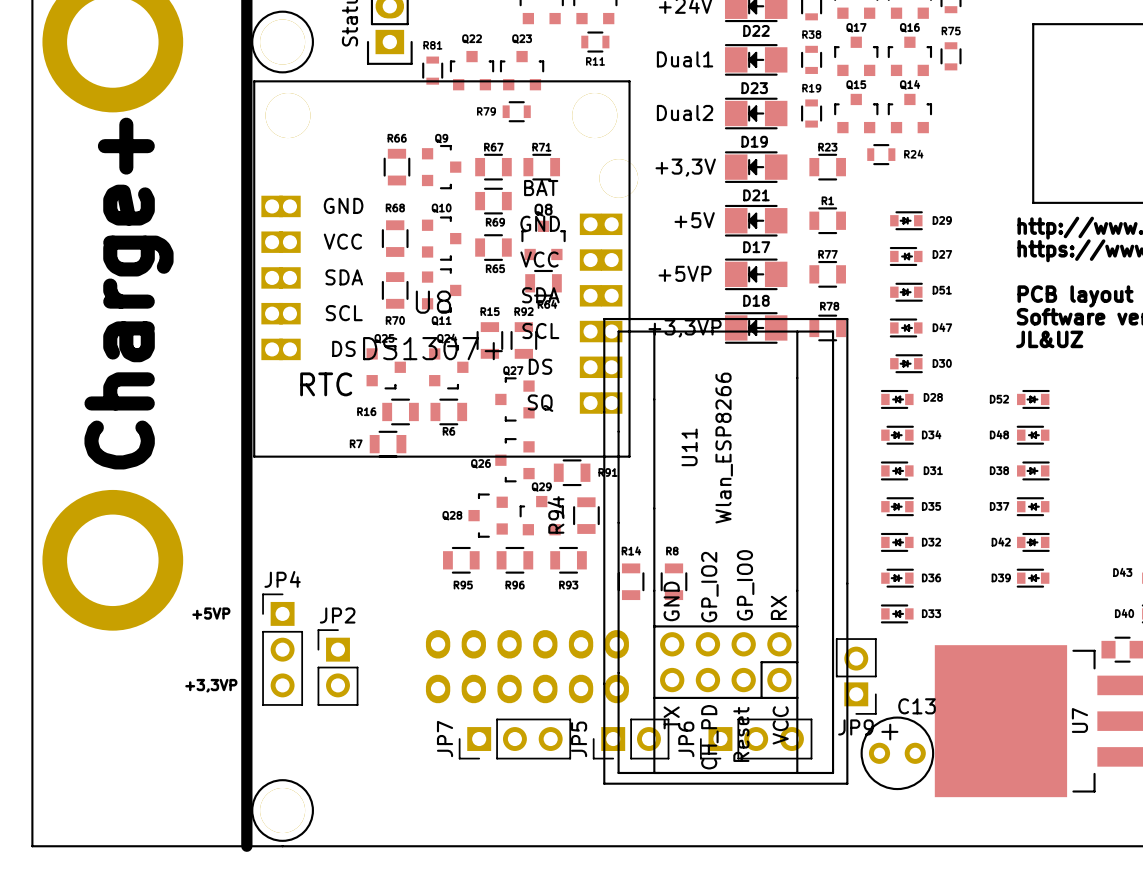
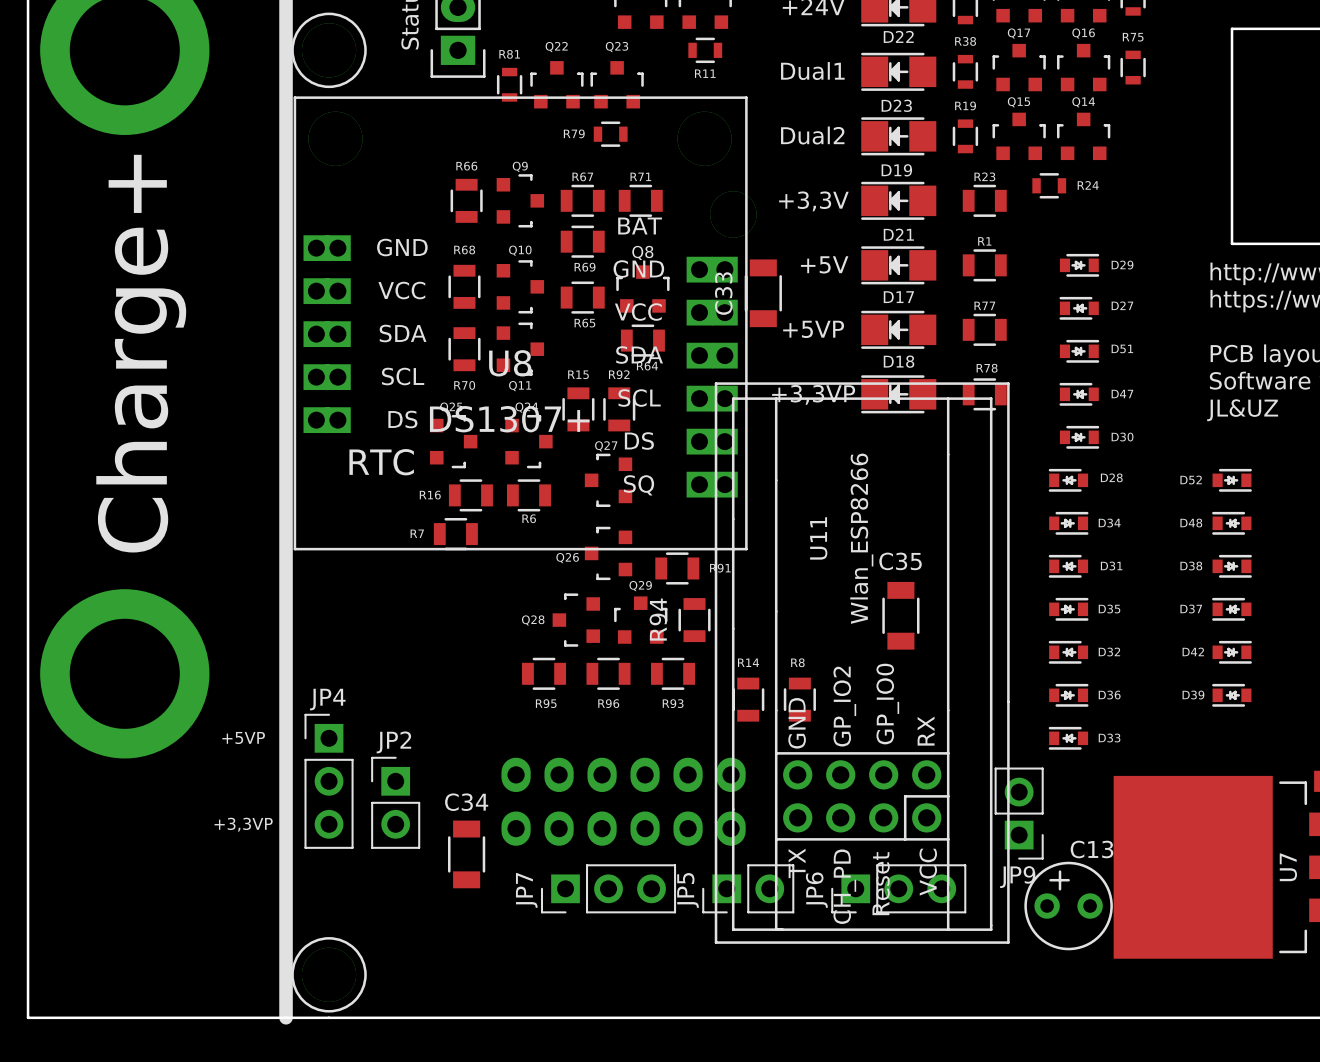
C33: none -> (763, 293)
C35: none -> (900, 615)
C34: none -> (466, 854)

